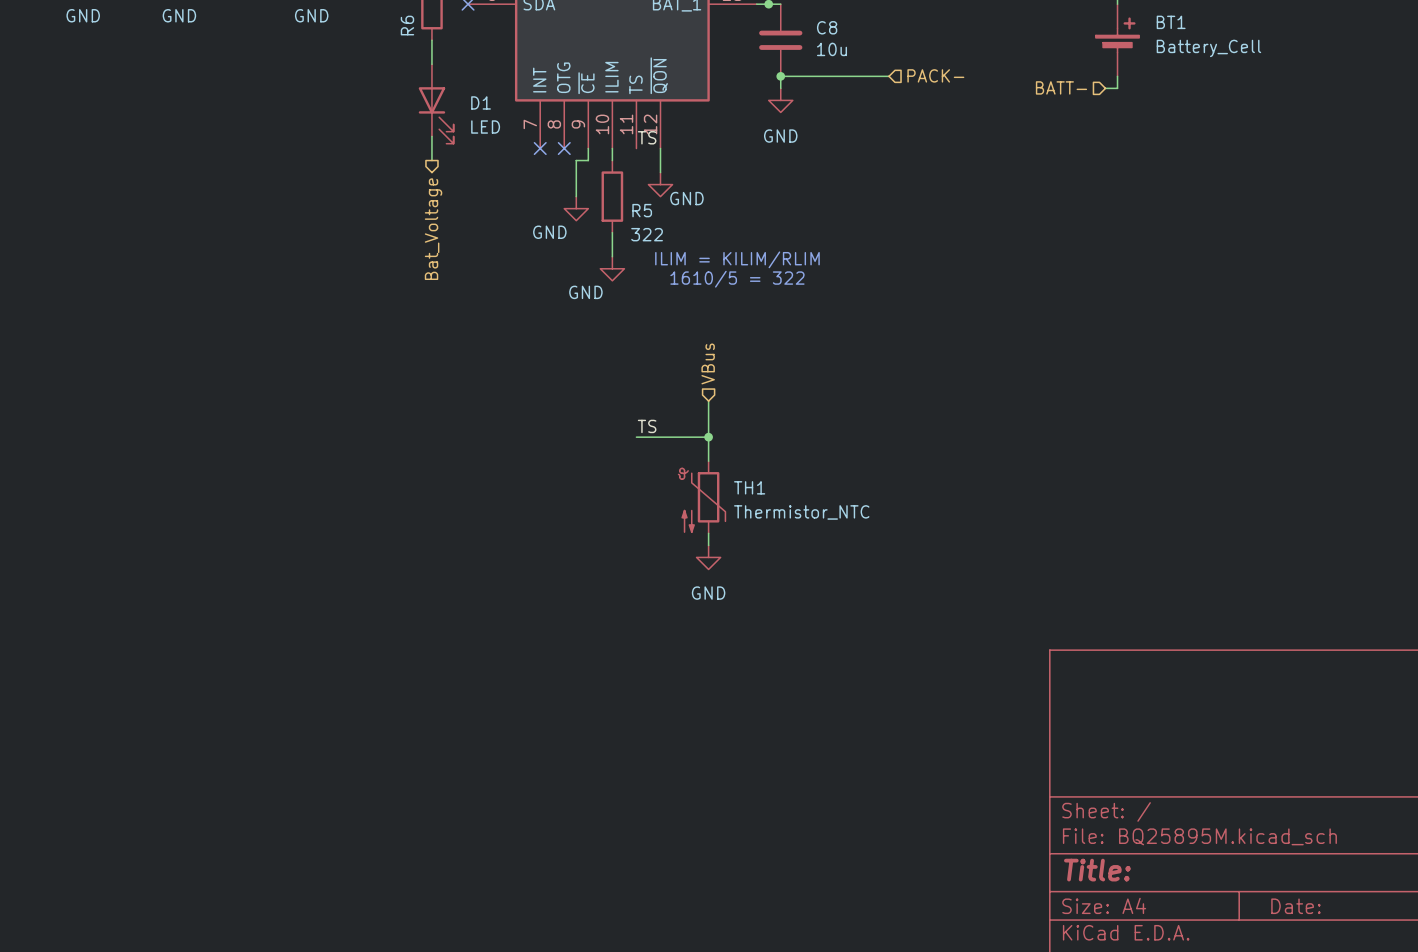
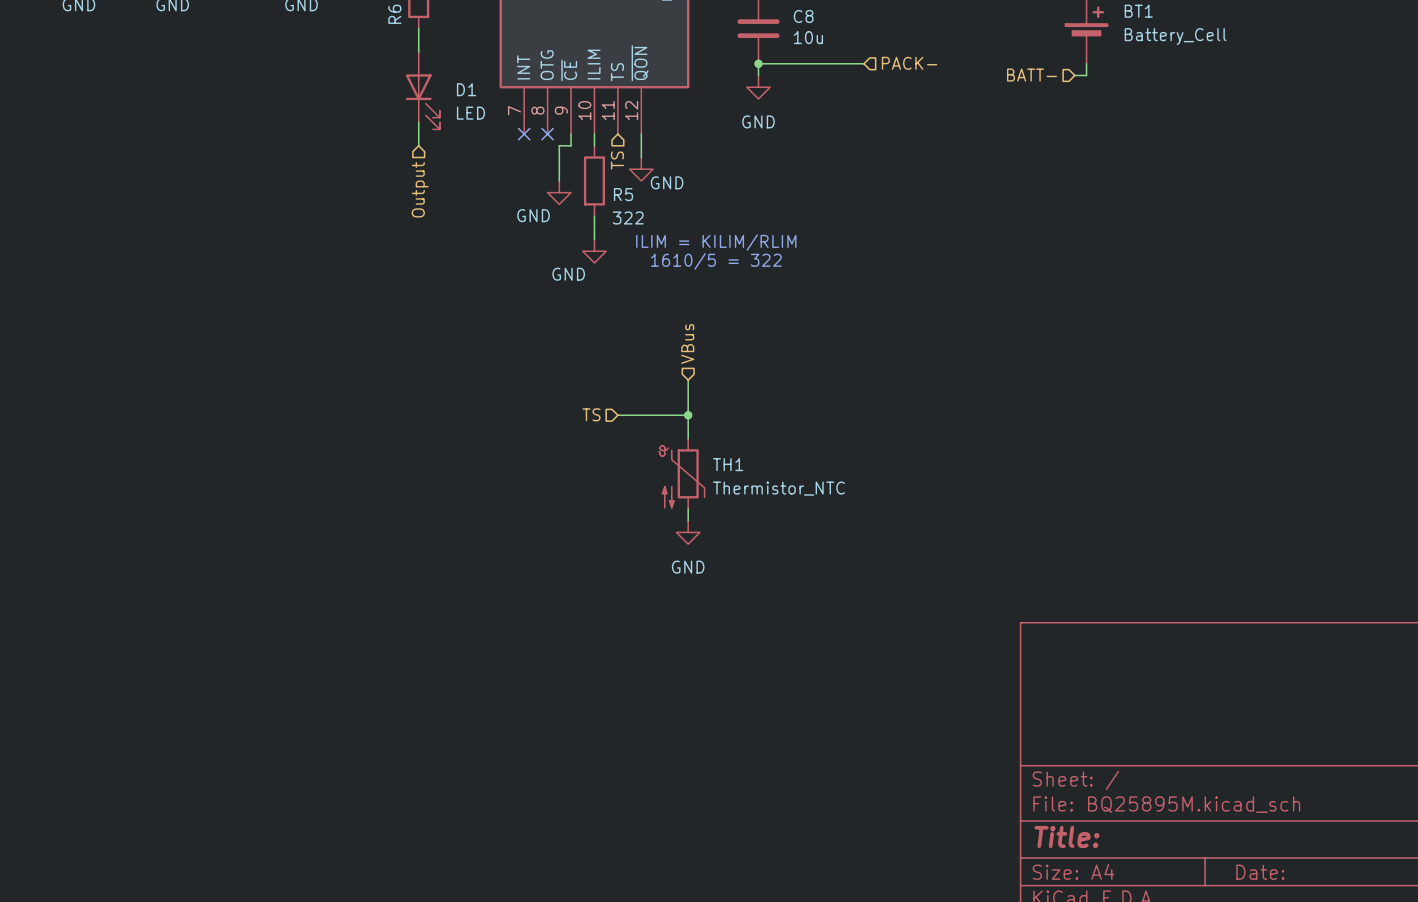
label: TS (647, 137) -> none
hierarchical label: none -> TS (617, 160)
hierarchical label shape: output (433, 229) -> input (420, 189)
hierarchical label: Bat_Voltage (433, 229) -> Output (420, 189)
label: TS (647, 426) -> none
hierarchical label: none -> TS (591, 414)

